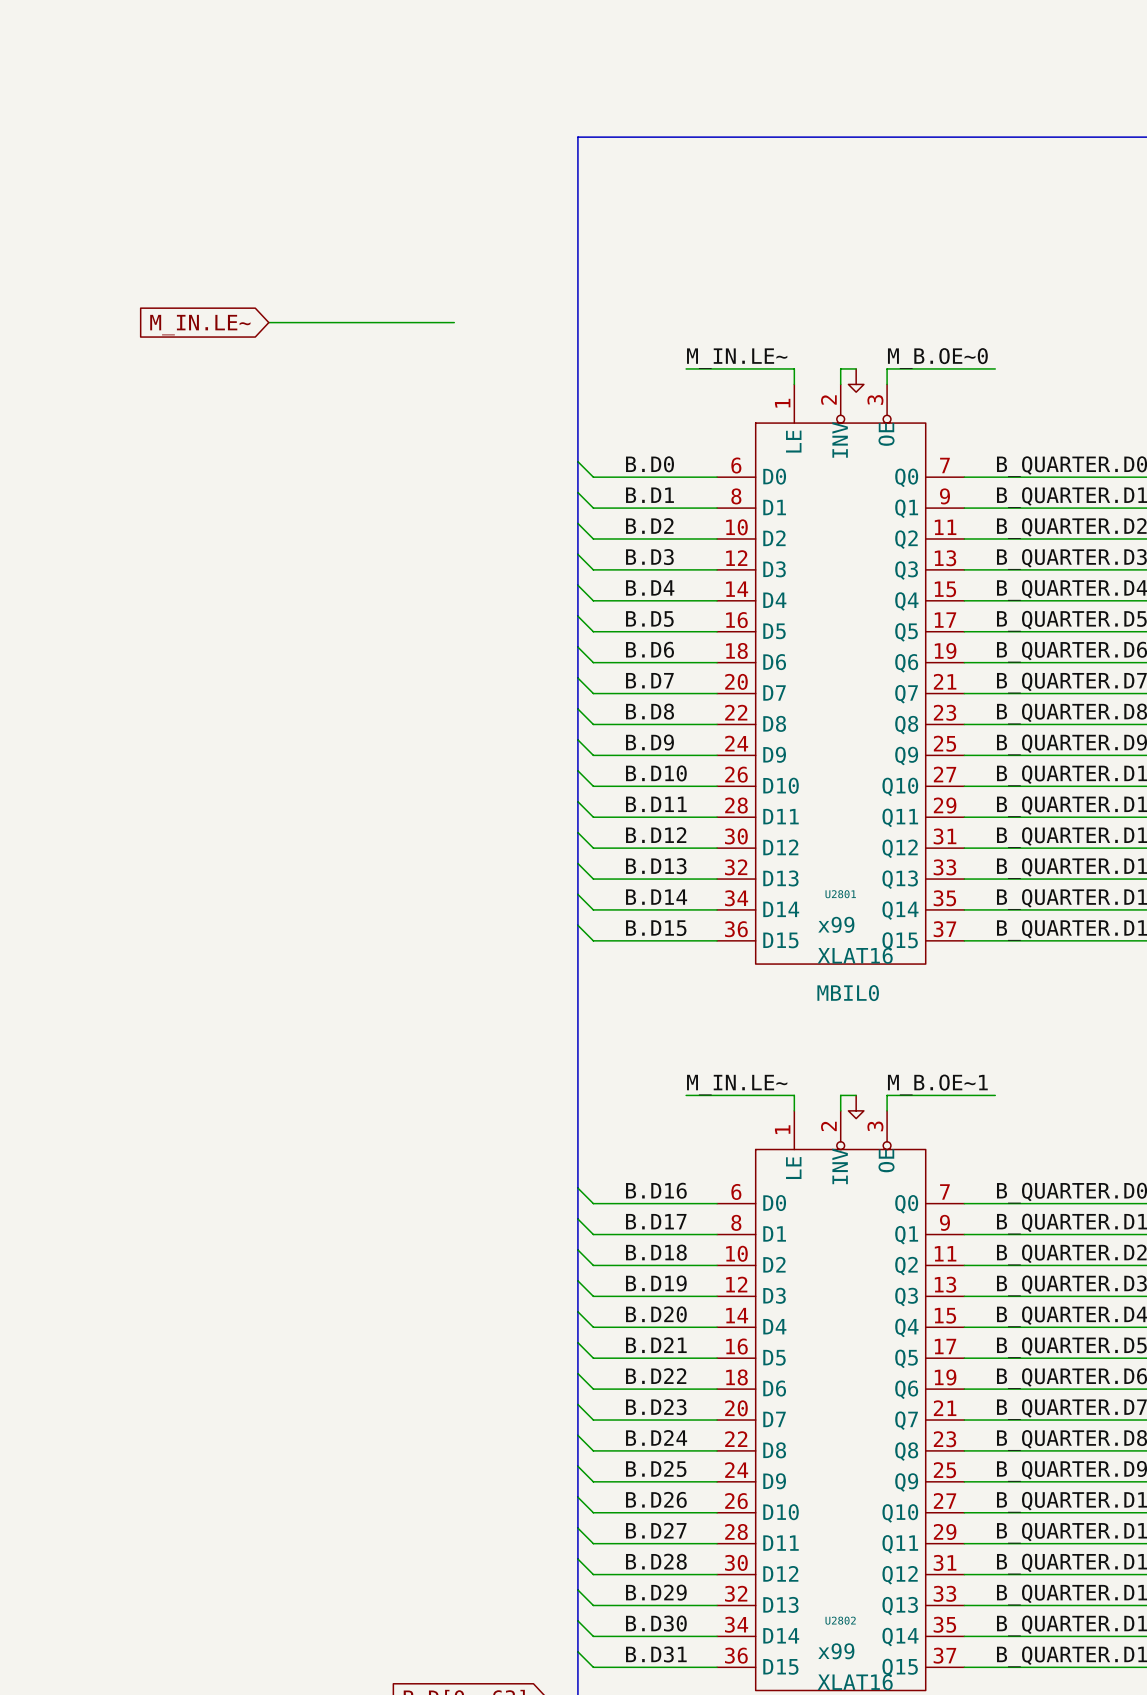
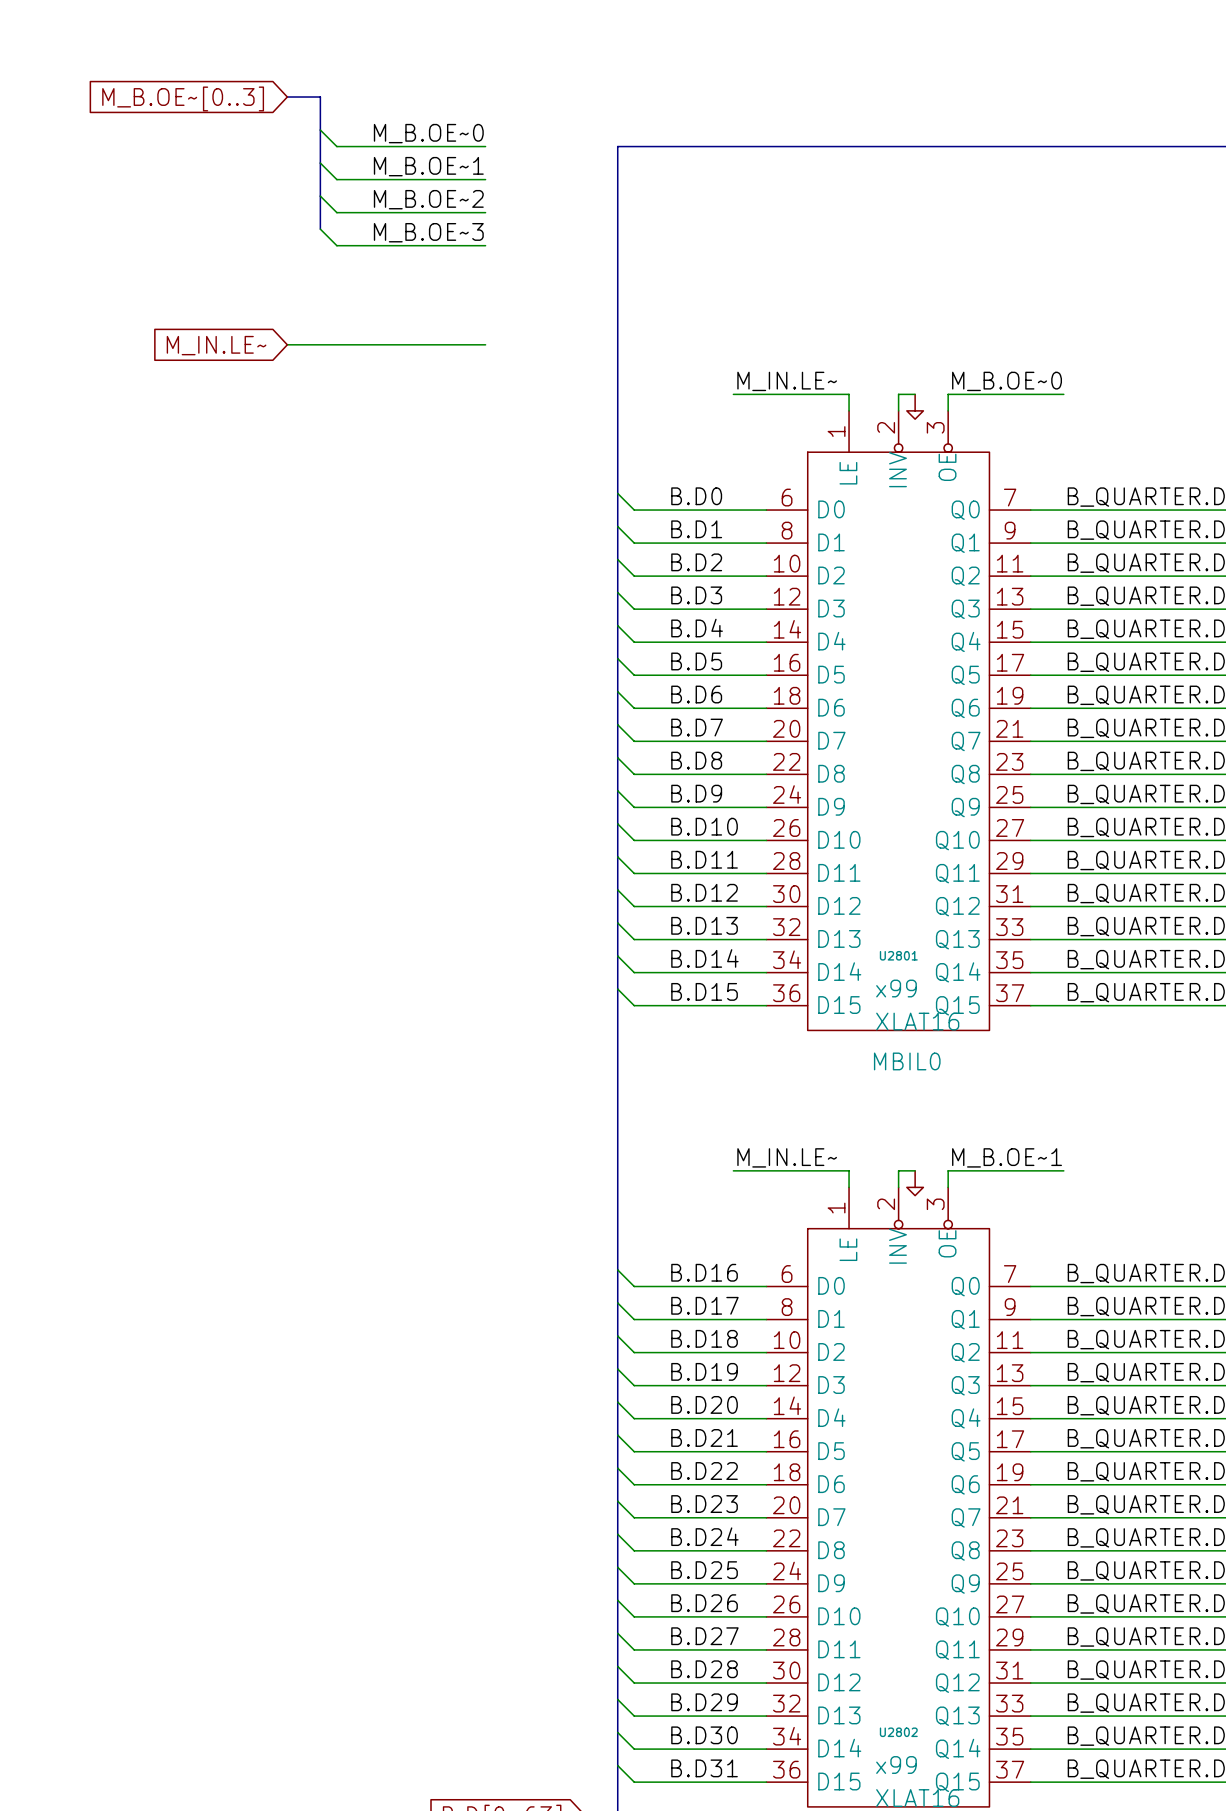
bus: none -> (287, 97) (320, 97) (320, 229)
global label: none -> M_B.OE~[0..3] (183, 98)
wire: none -> (320, 130) (336, 146) (485, 146)
label: none -> M_B.OE~0 (428, 133)
wire: none -> (320, 163) (336, 179) (485, 179)
label: none -> M_B.OE~1 (428, 166)
wire: none -> (320, 196) (336, 212) (485, 212)
label: none -> M_B.OE~2 (428, 199)
wire: none -> (320, 229) (336, 245) (485, 245)
label: none -> M_B.OE~3 (428, 232)

